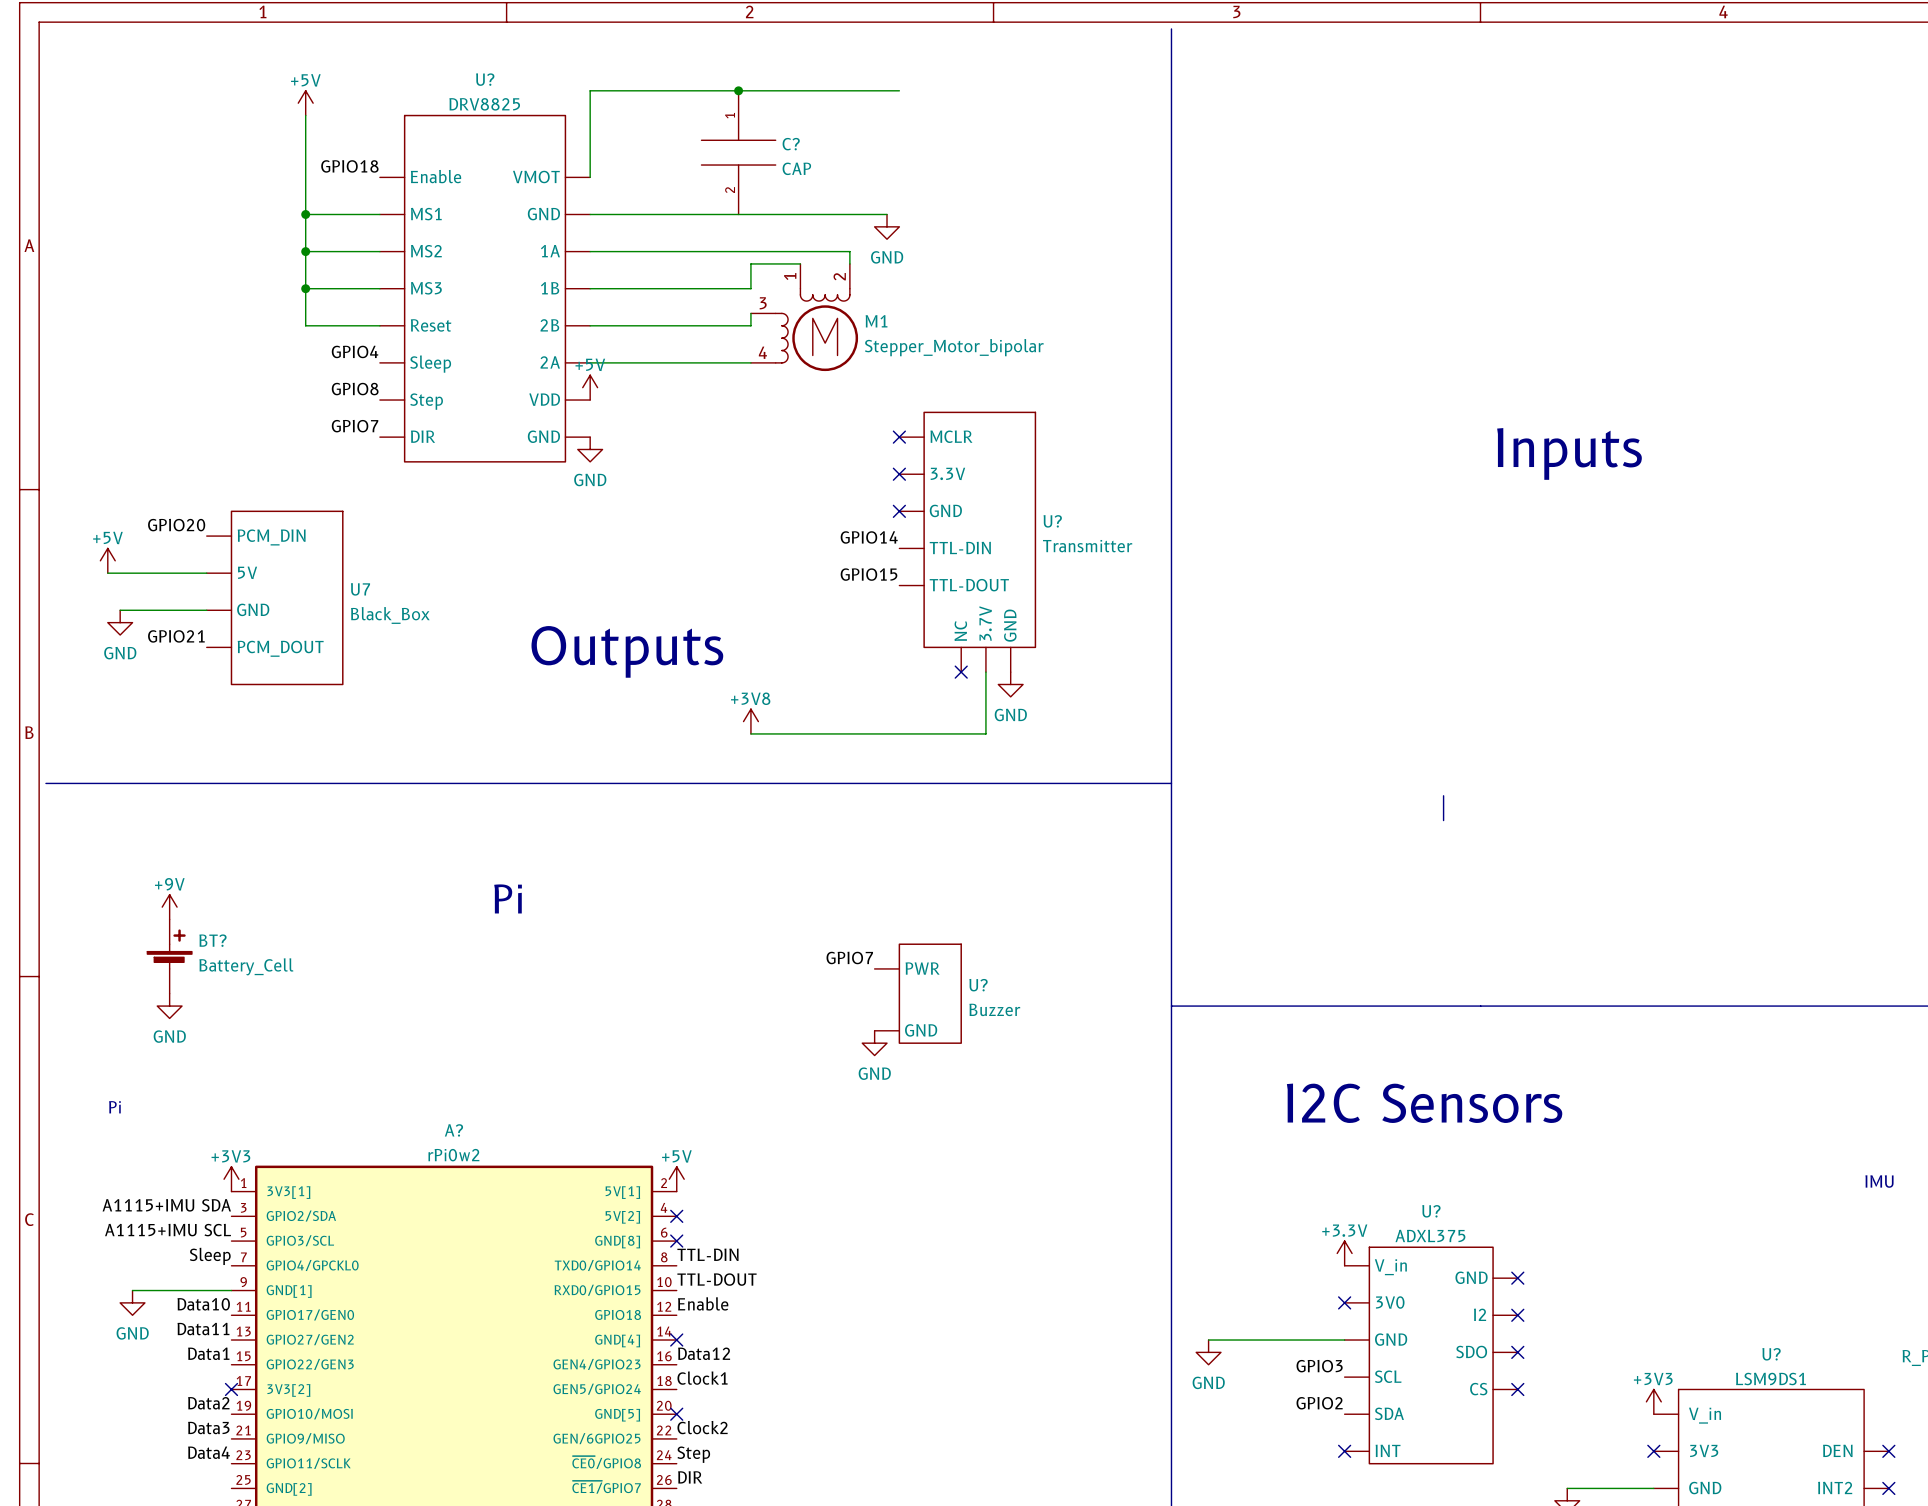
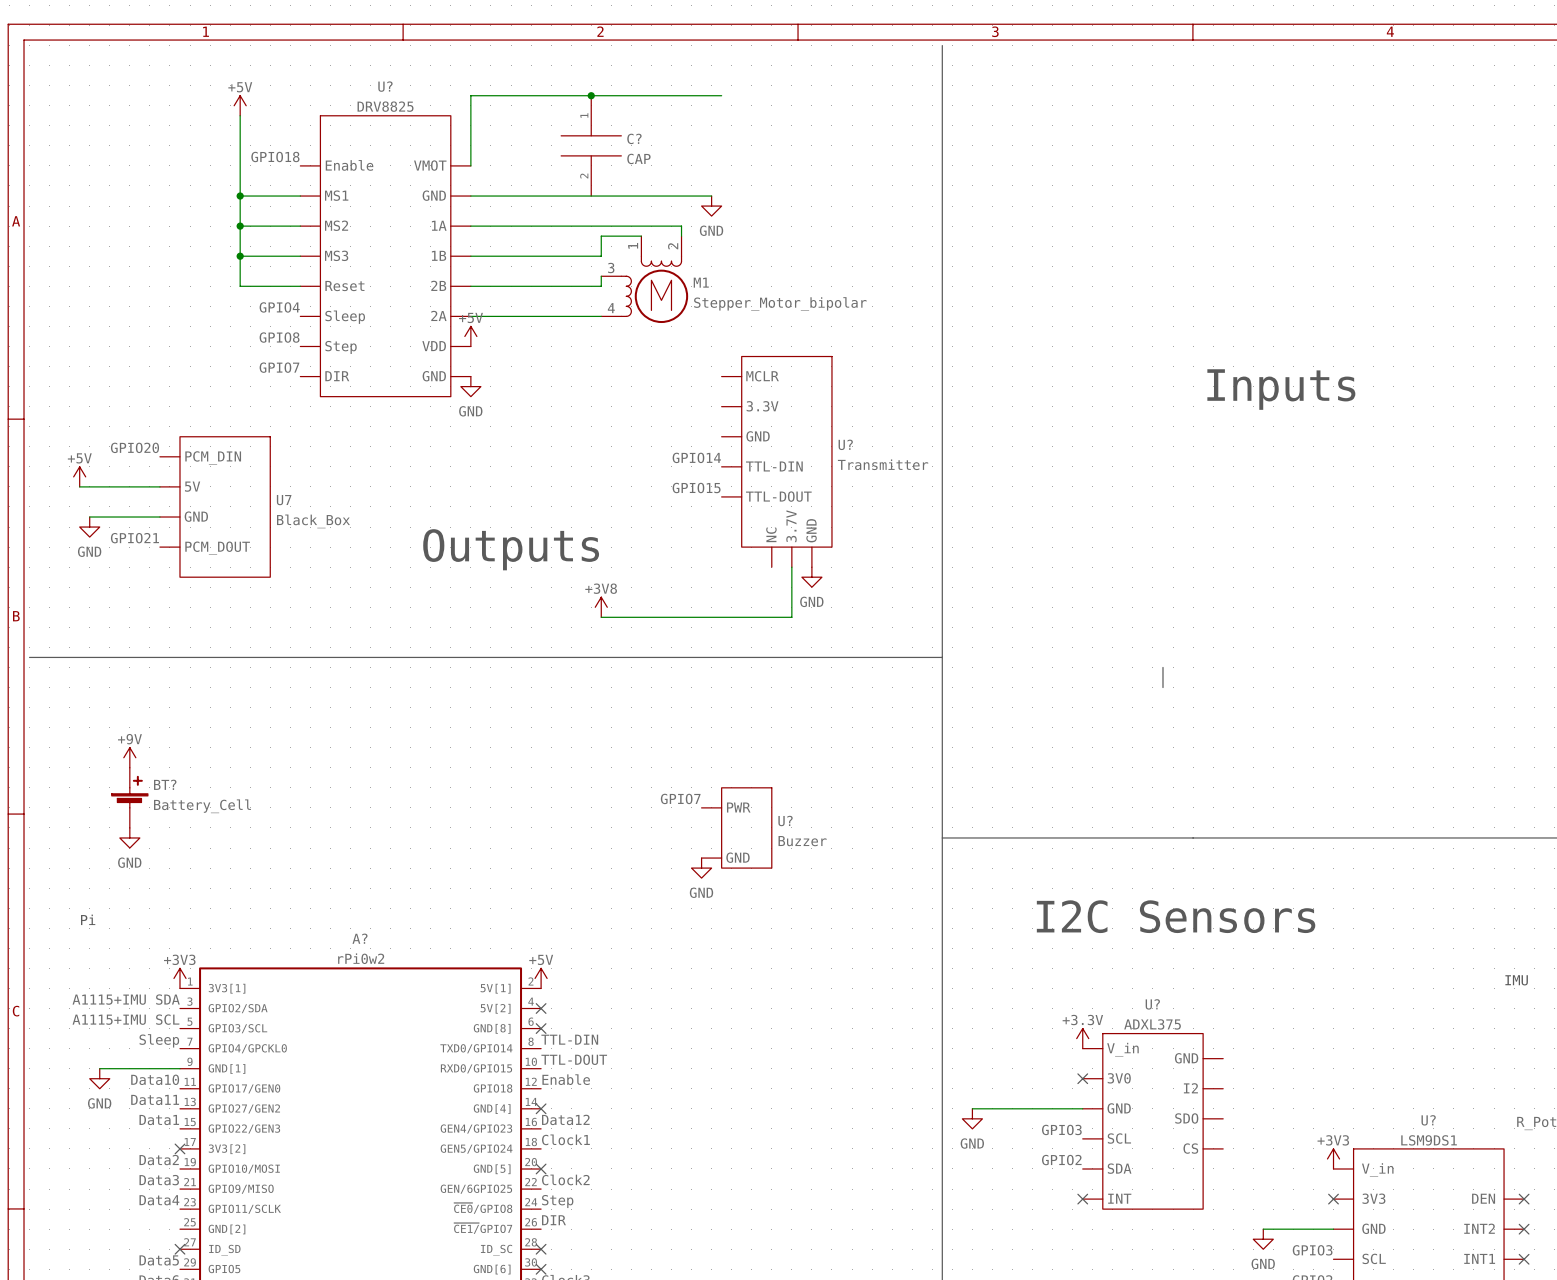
no-connect mark: (899, 437) -> none
no-connect mark: (899, 474) -> none
no-connect mark: (899, 511) -> none
no-connect mark: (961, 672) -> none
text: Pi (508, 898) -> none
no-connect mark: (1517, 1278) -> none
no-connect mark: (1517, 1315) -> none
no-connect mark: (1517, 1352) -> none
no-connect mark: (1517, 1389) -> none

